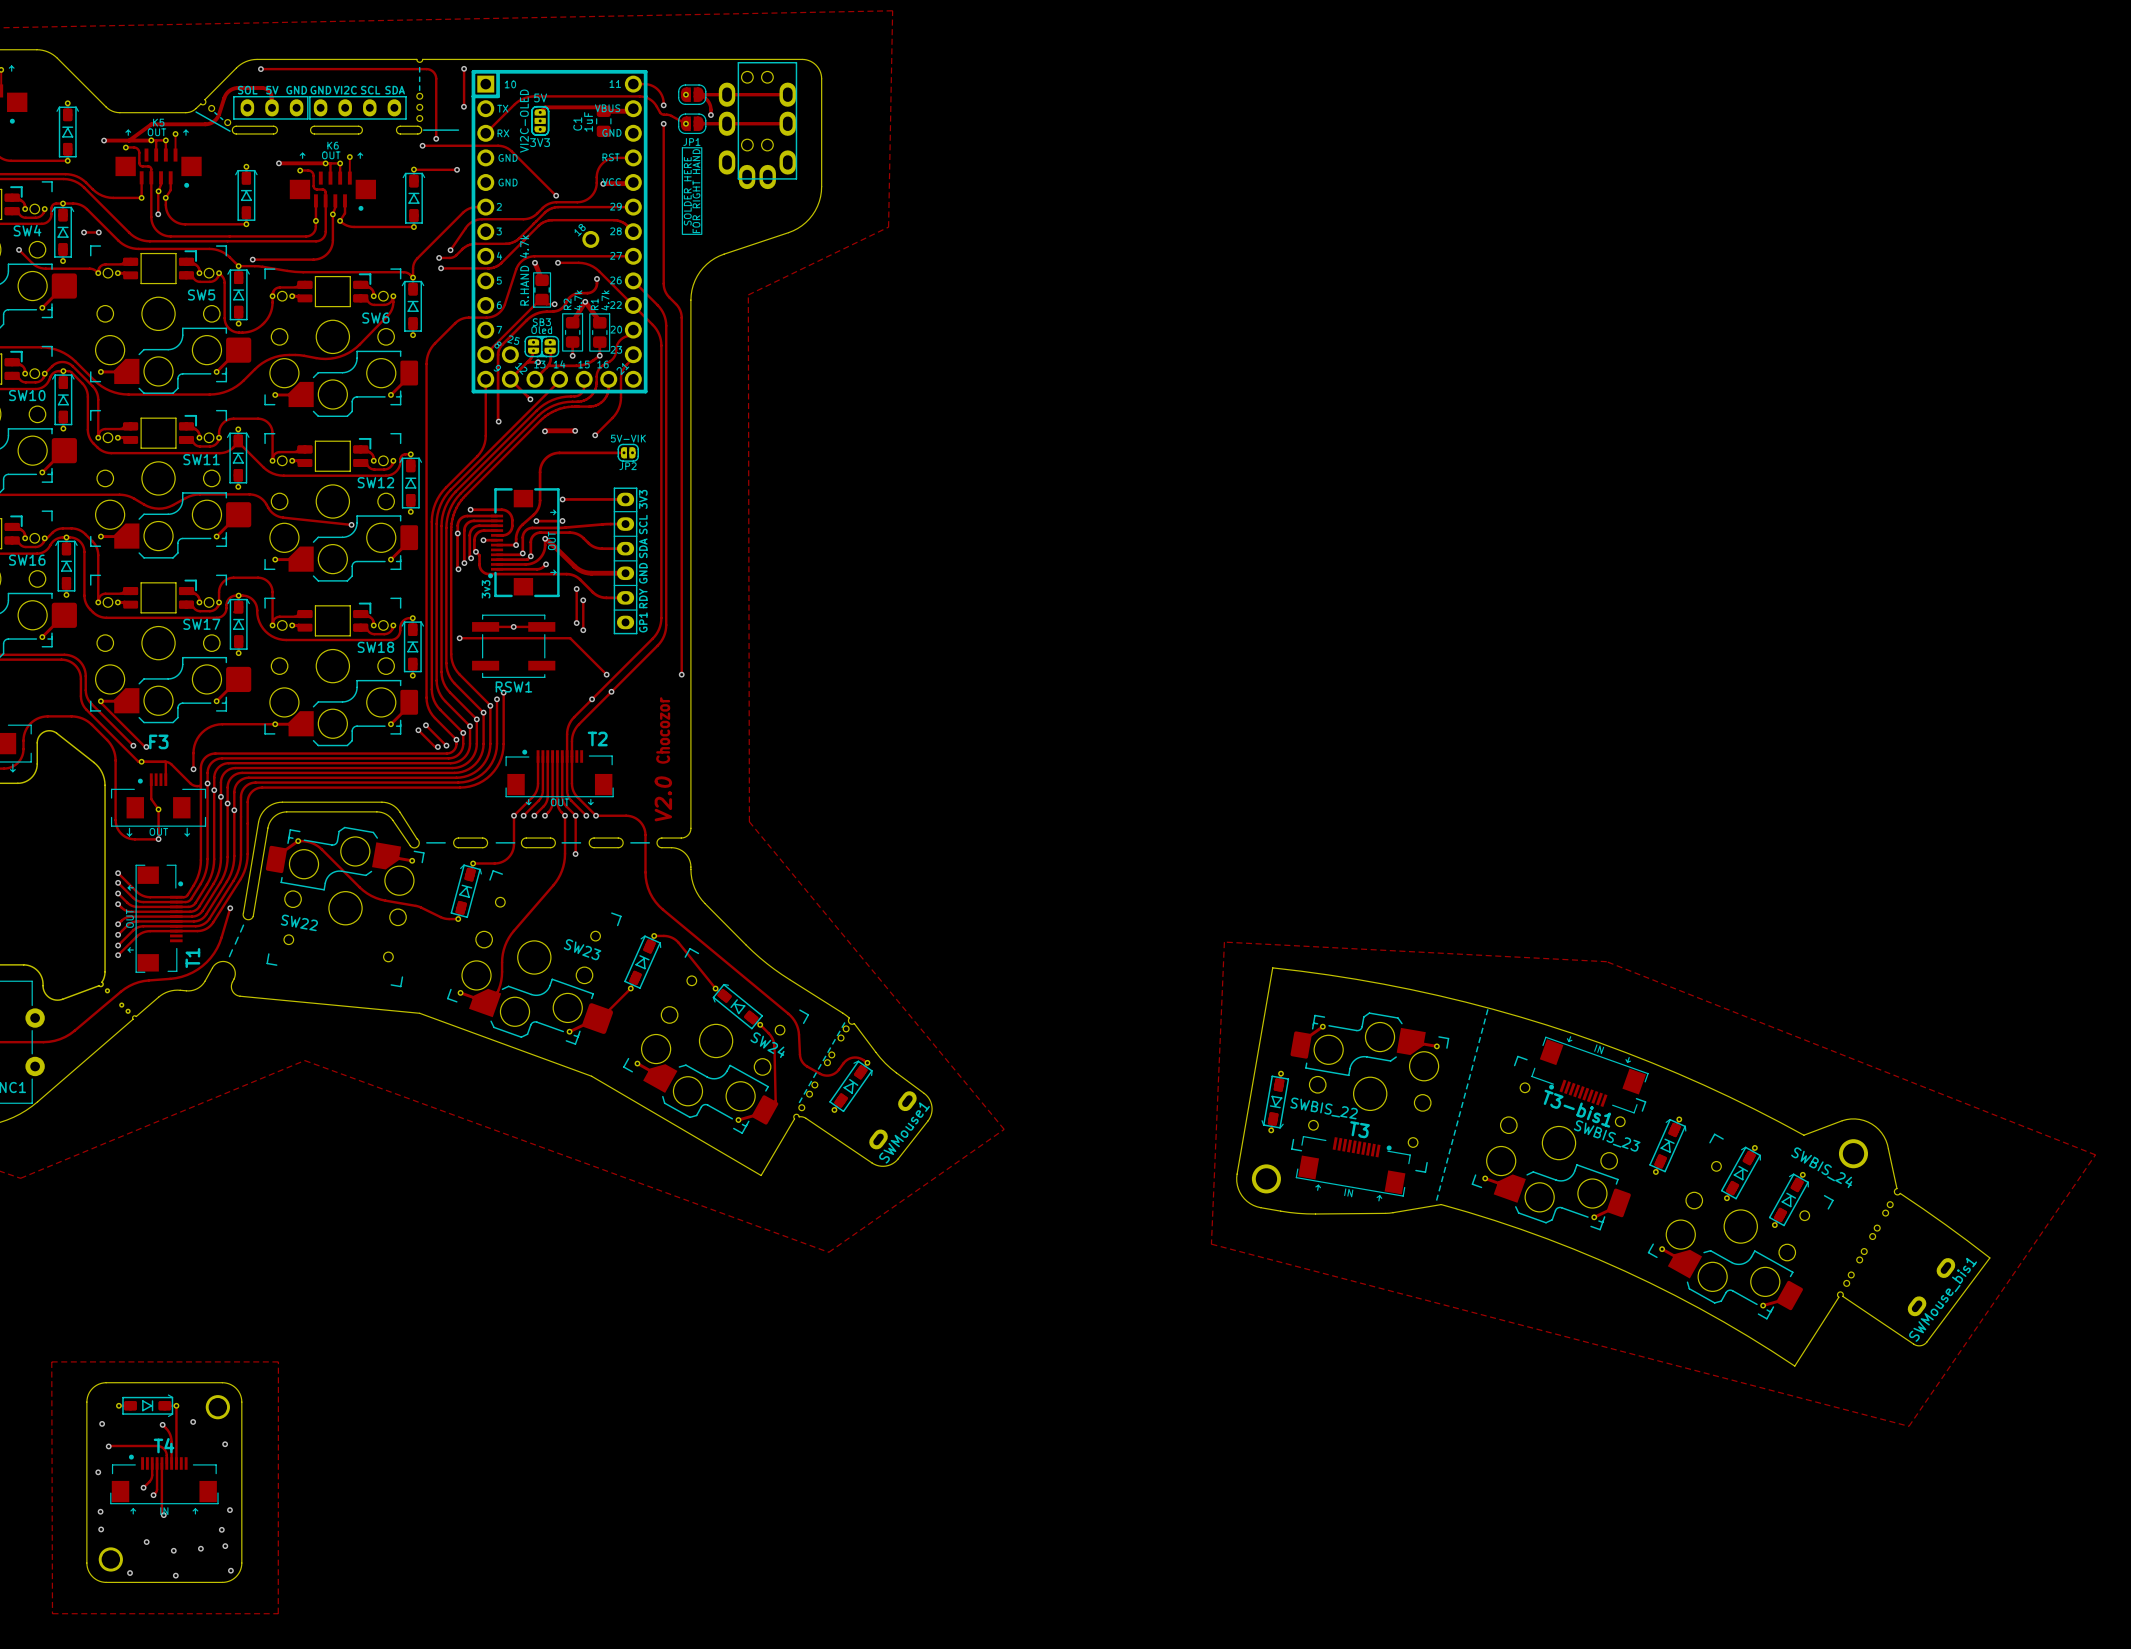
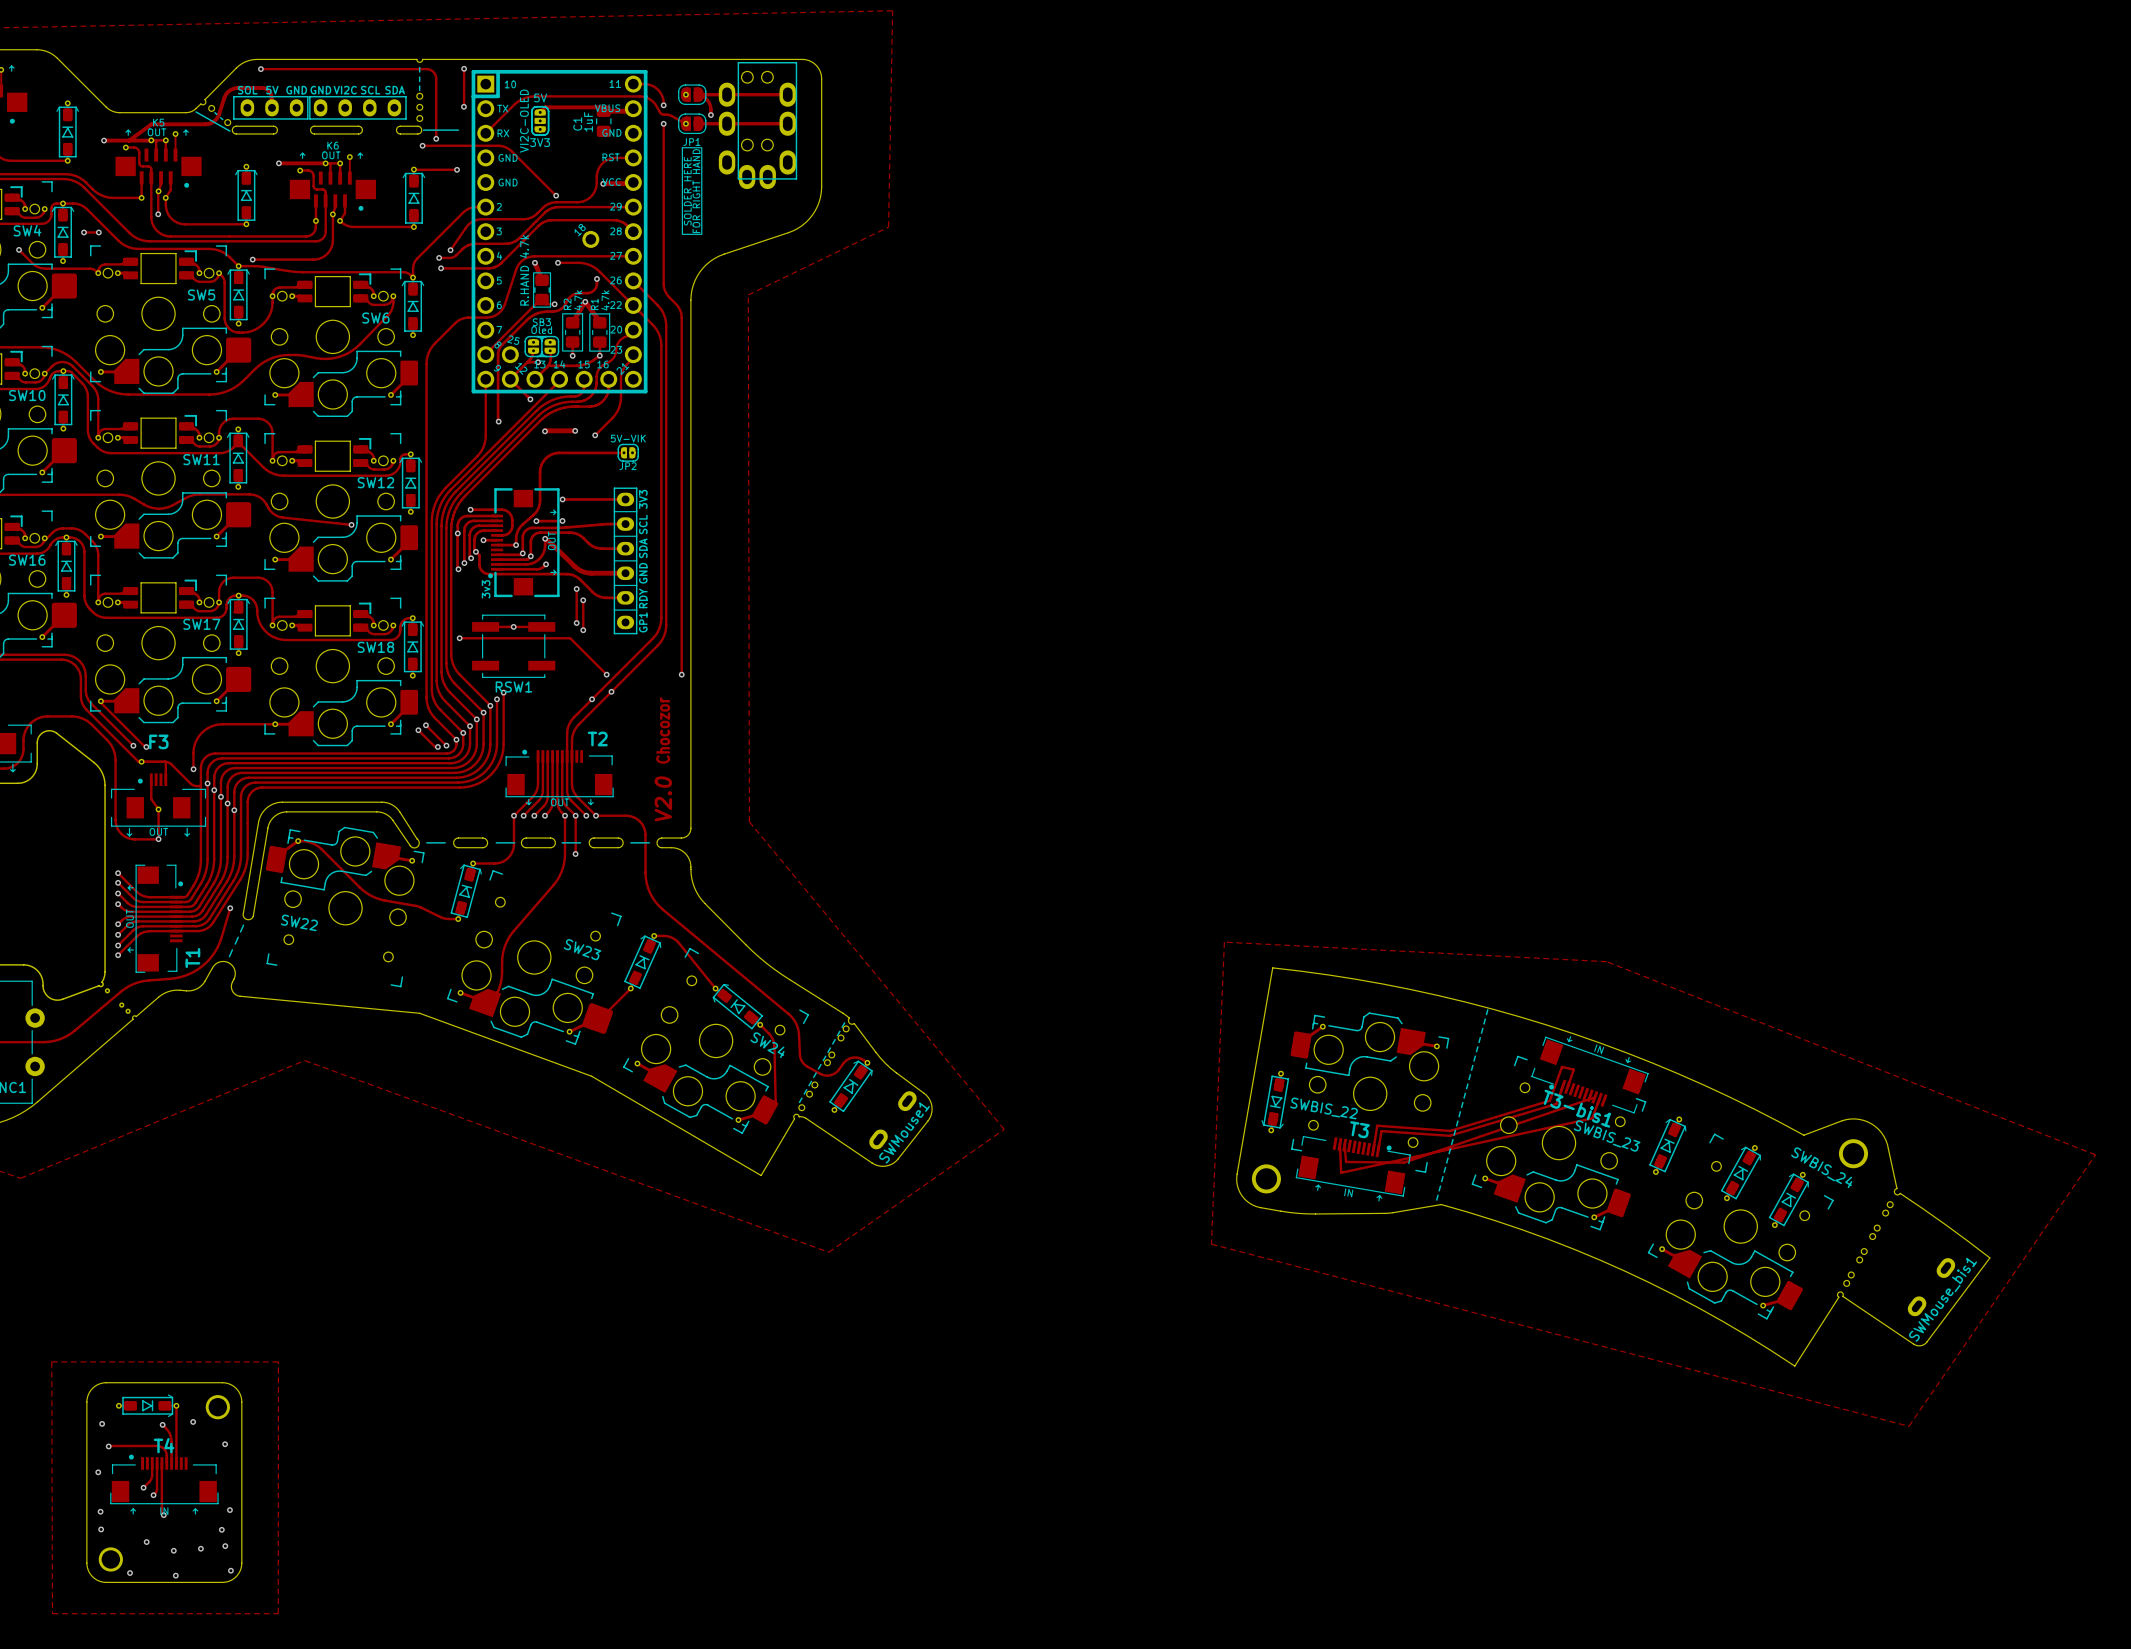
track: none -> (1562, 1086) (1556, 1103) (1449, 1135) (1381, 1131) (1378, 1150)
track: none -> (1567, 1087) (1573, 1069) (1561, 1066) (1549, 1100) (1450, 1130) (1377, 1125) (1373, 1150)
track: none -> (1594, 1097) (1404, 1162) (1346, 1161) (1344, 1145)
track: none -> (1599, 1099) (1592, 1118) (1341, 1172) (1339, 1144)

